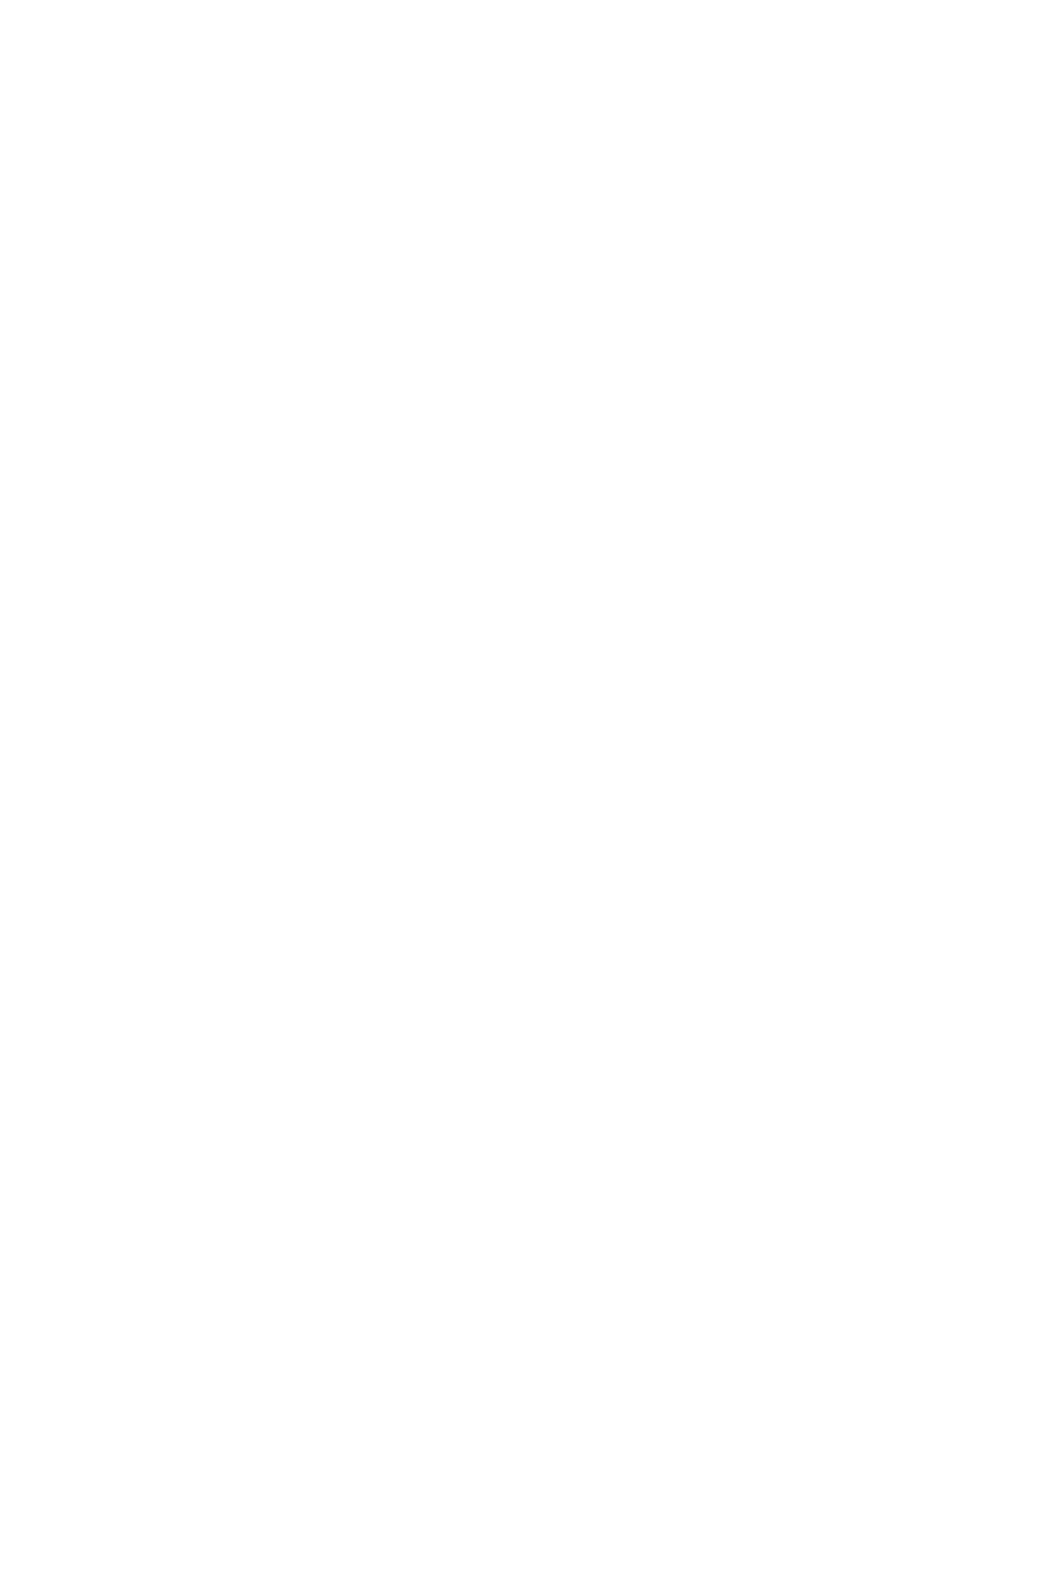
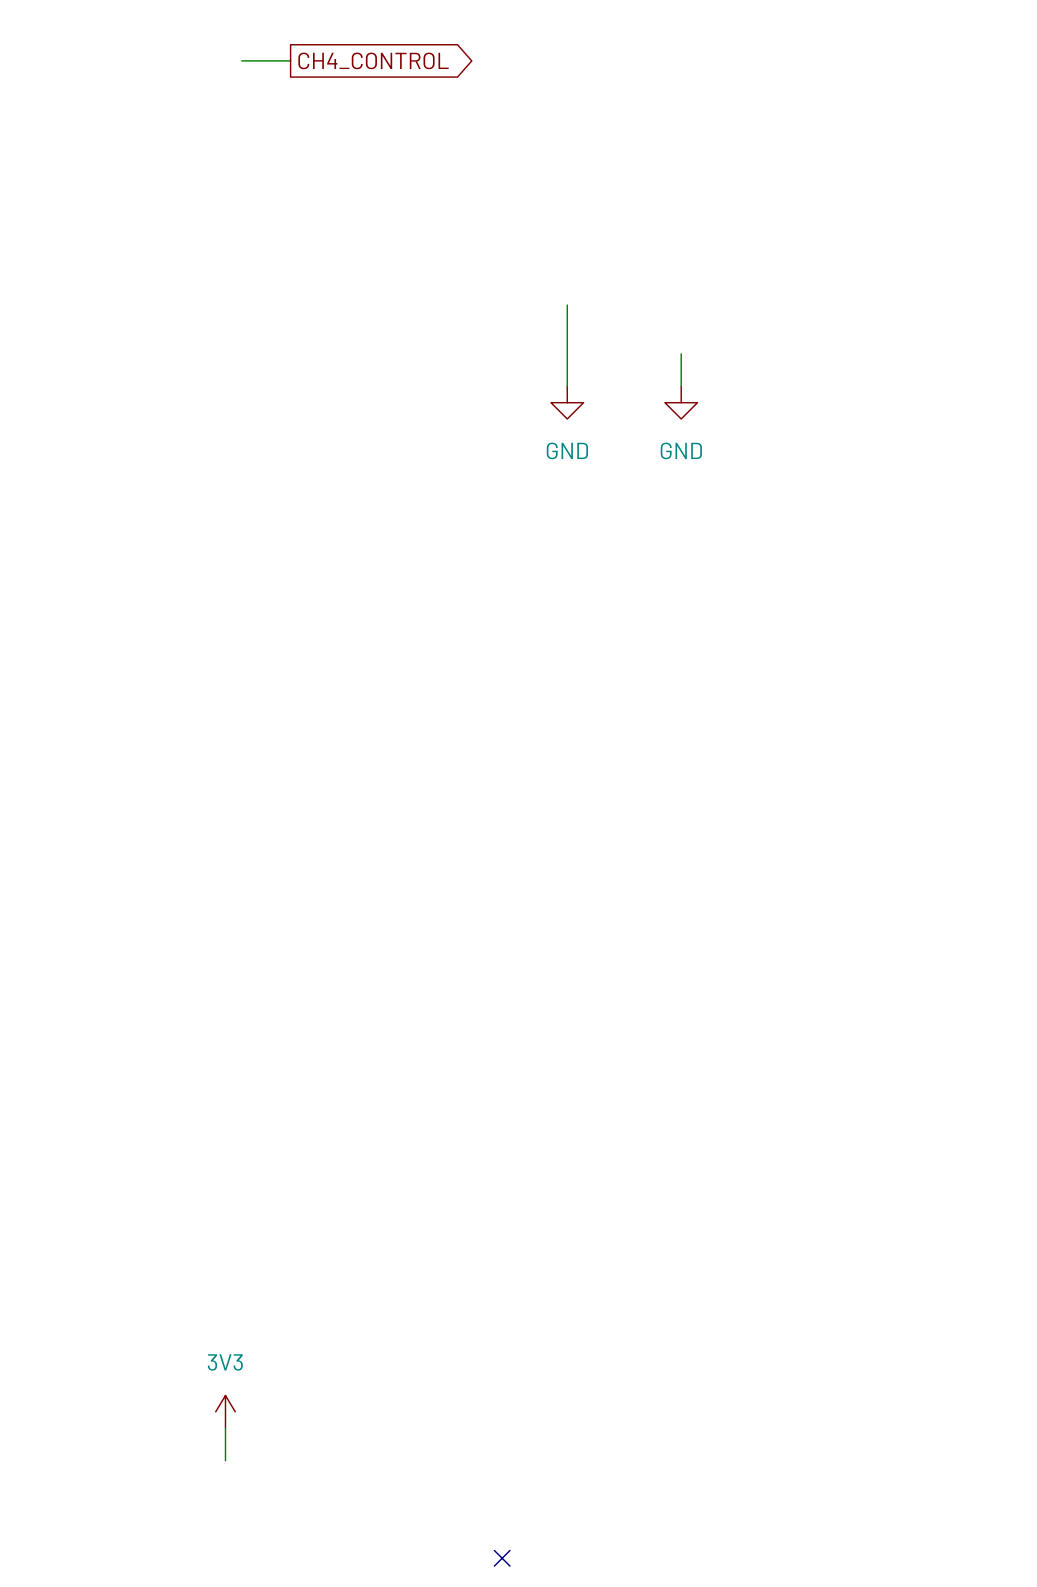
wire: none -> (241, 60) (290, 60)
global label: none -> CH4_CONTROL (373, 60)
wire: none -> (567, 305) (567, 386)
wire: none -> (681, 353) (681, 386)
power symbol: none -> GND (567, 402)
power symbol: none -> GND (681, 402)
power symbol: none -> 3V3 (225, 1411)
wire: none -> (225, 1428) (225, 1460)
no-connect mark: none -> (502, 1558)

